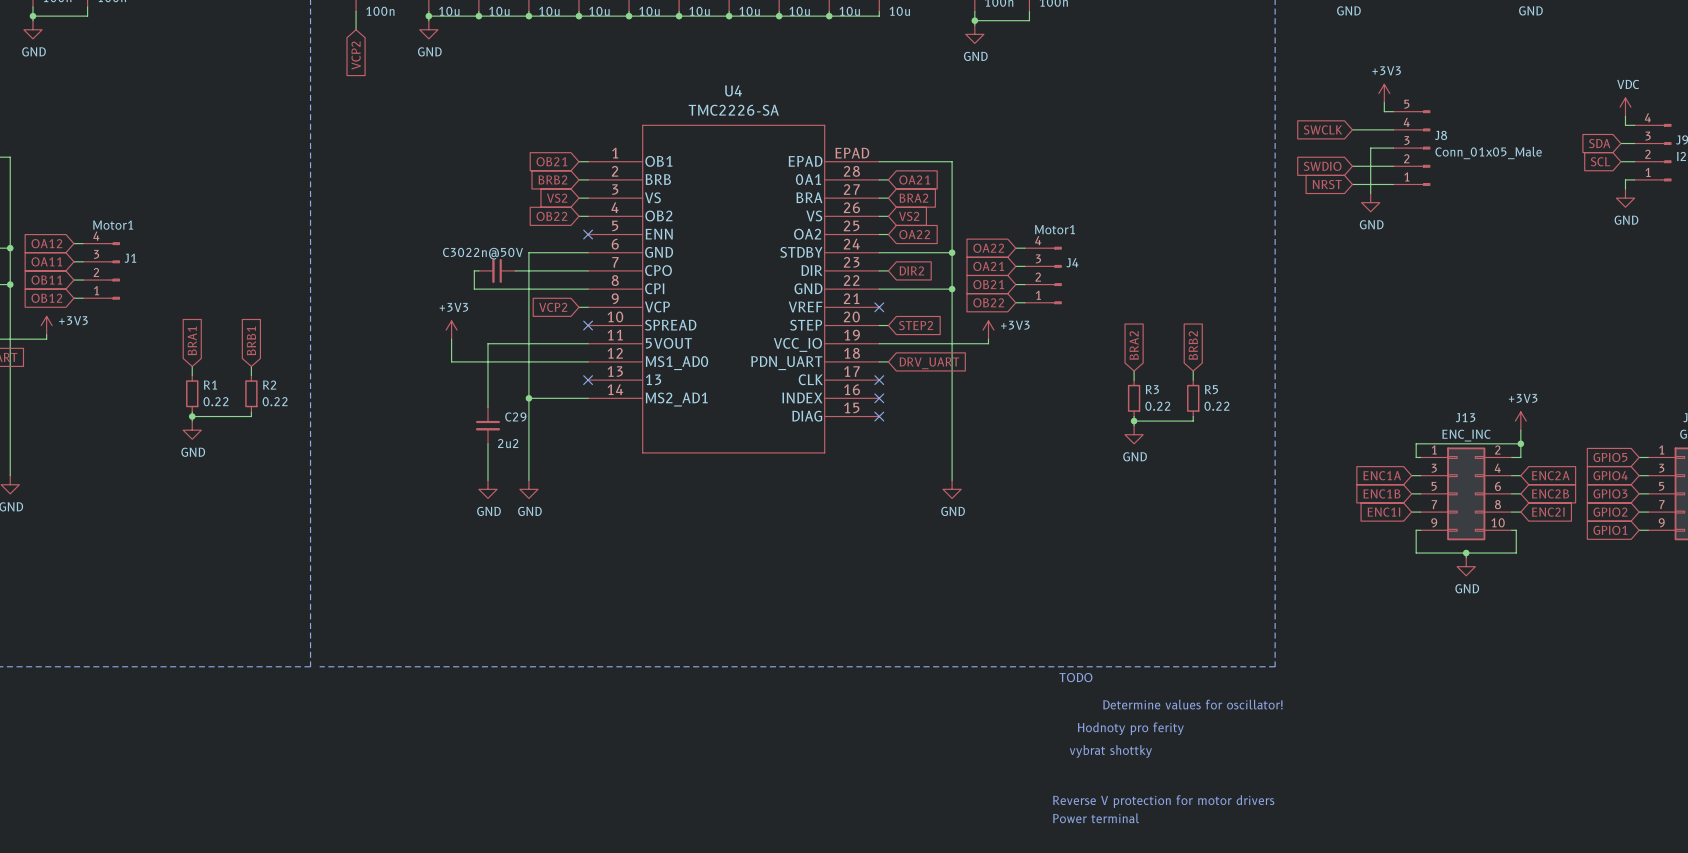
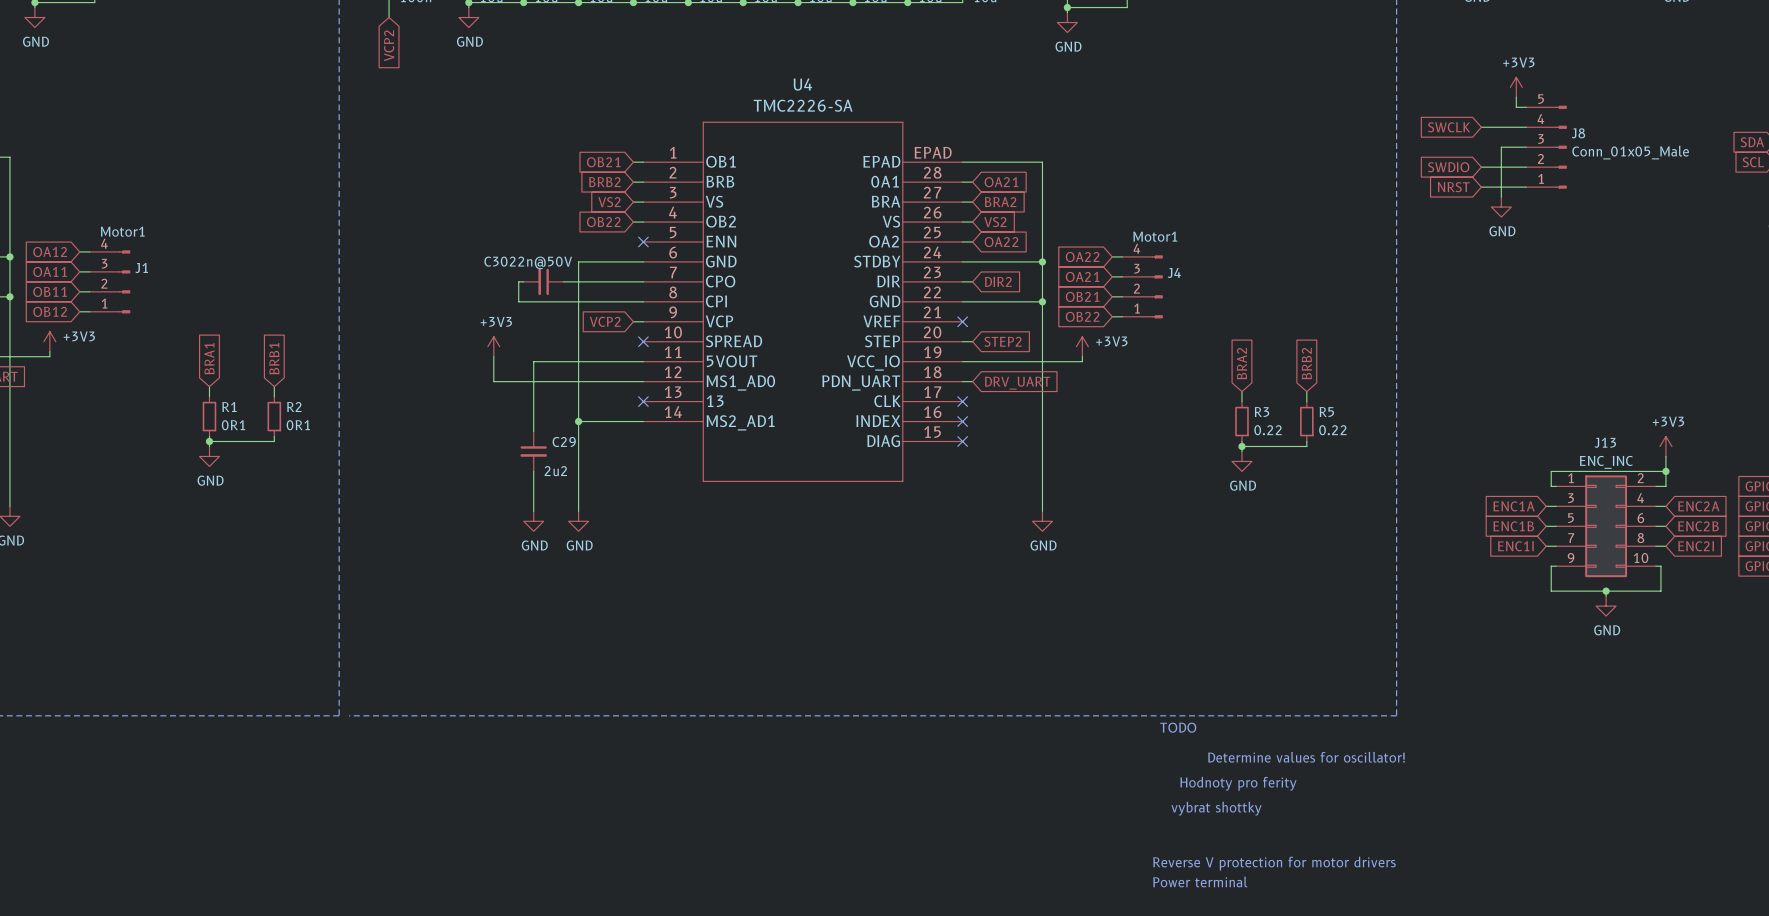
R1 value: 0.22 (215, 401) -> 0R1 (233, 425)
R2 value: 0.22 (275, 401) -> 0R1 (298, 425)

